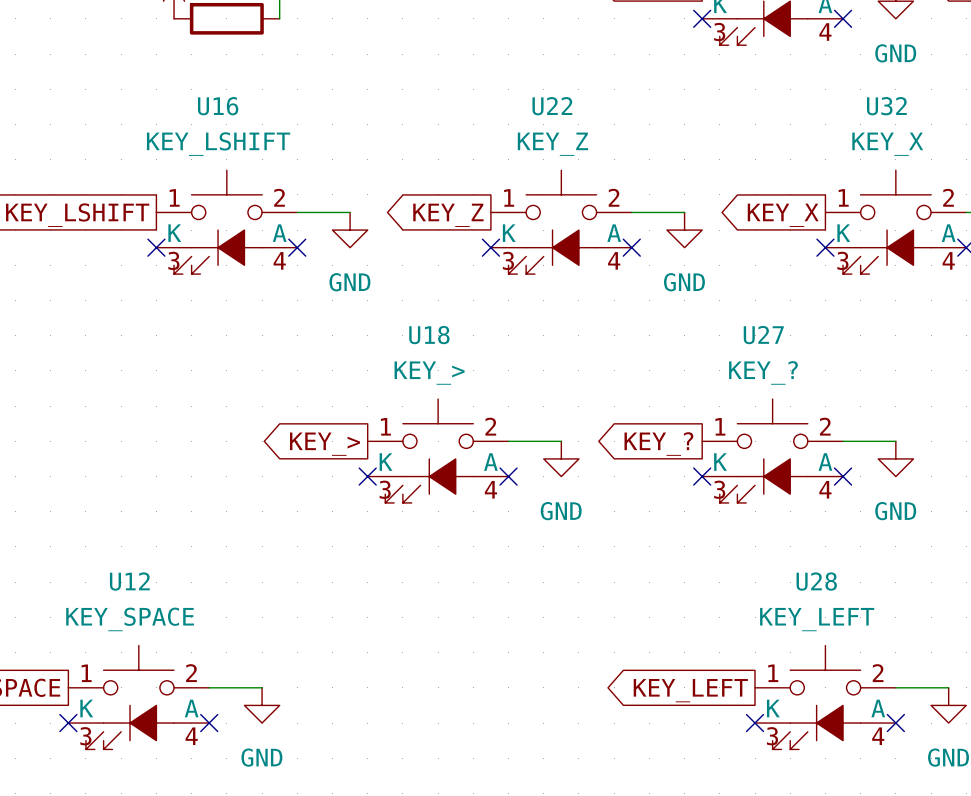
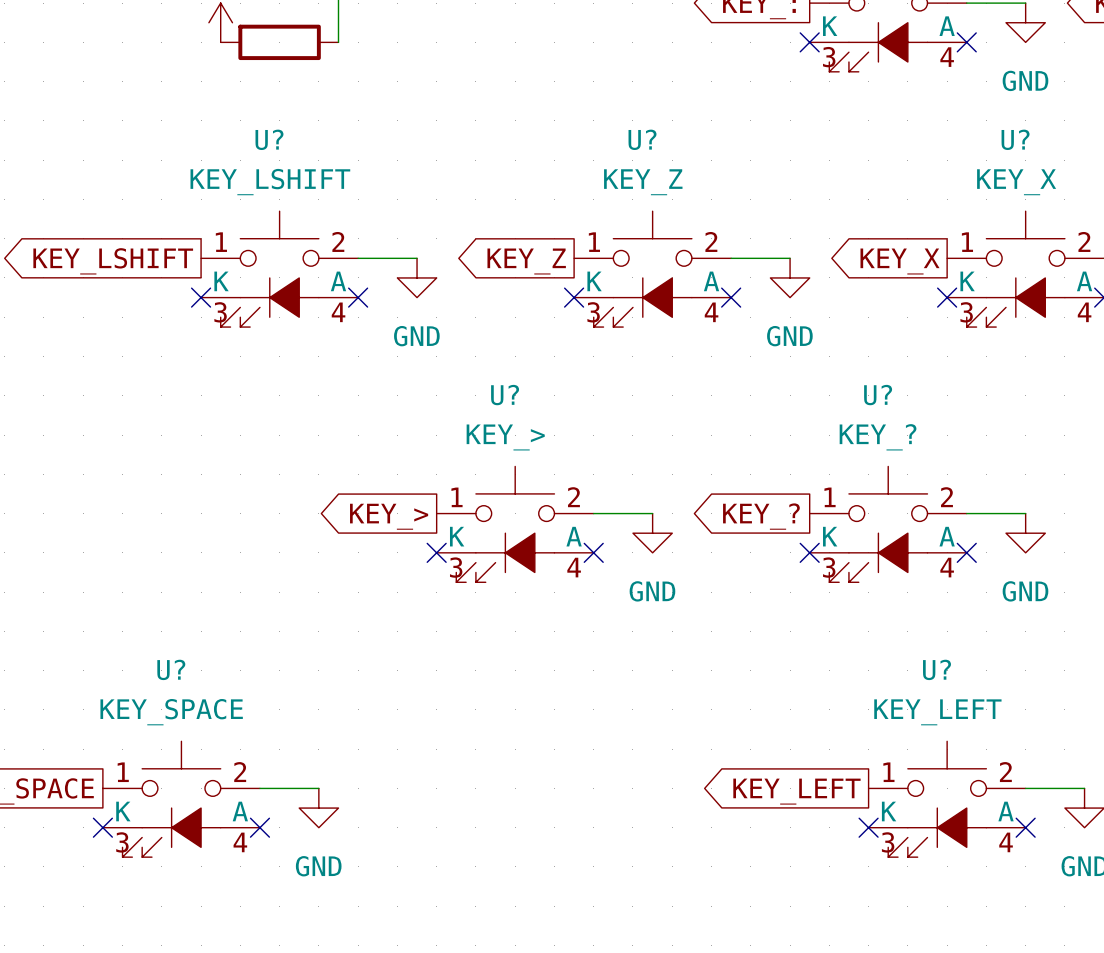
U16 name: U16 (218, 106) -> U? (269, 139)
U22 name: U22 (552, 106) -> U? (642, 139)
U32 name: U32 (886, 106) -> U? (1015, 139)
U18 name: U18 (429, 335) -> U? (505, 395)
U27 name: U27 (763, 335) -> U? (878, 395)
U12 name: U12 (129, 581) -> U? (171, 669)
U28 name: U28 (816, 581) -> U? (937, 669)

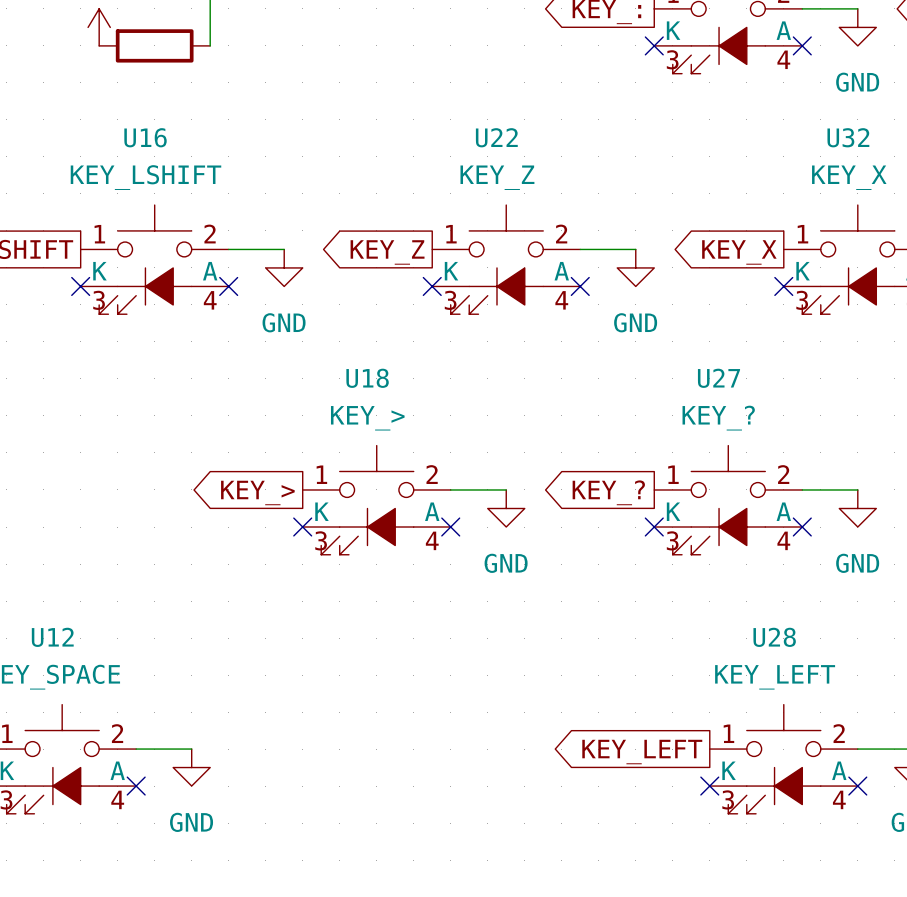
U? name: U? (269, 139) -> U16 (145, 137)
U? name: U? (642, 139) -> U22 (496, 137)
U? name: U? (1015, 139) -> U32 (848, 137)
U? name: U? (505, 395) -> U18 (367, 378)
U? name: U? (878, 395) -> U27 (718, 378)
U? name: U? (171, 669) -> U12 (52, 637)
U? name: U? (937, 669) -> U28 (774, 637)

